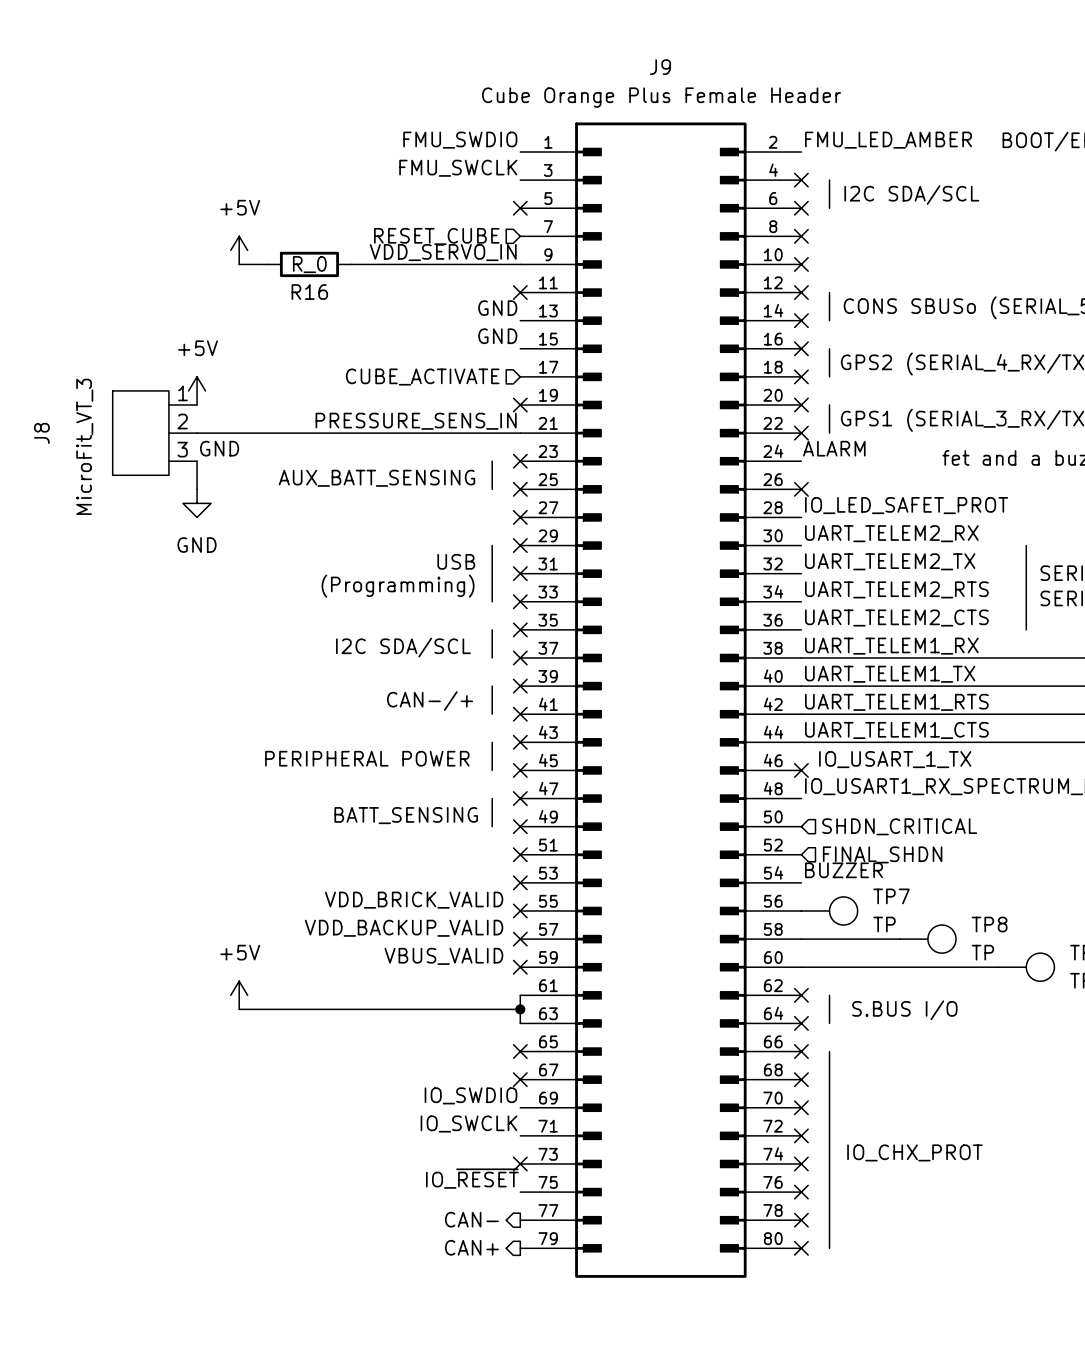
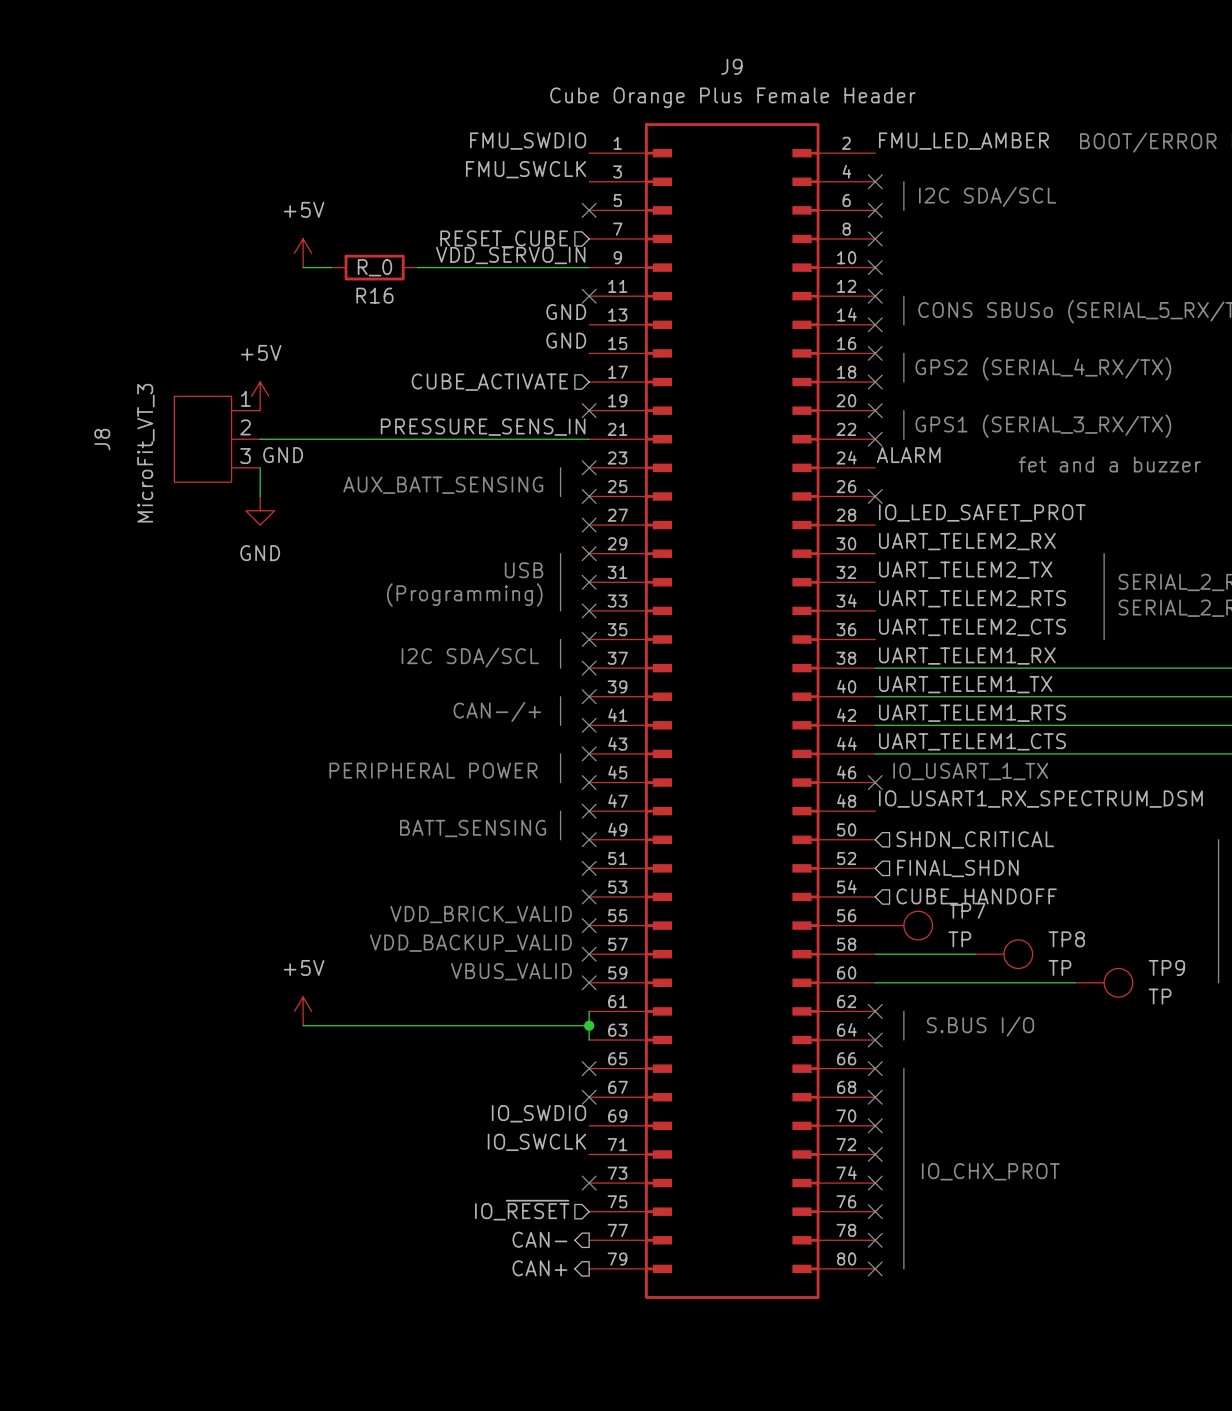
label: BUZZER (844, 870) -> none
hierarchical label: none -> CUBE_HANDOFF (976, 897)
label: IO_~{RESET} (472, 1178) -> none
hierarchical label: none -> IO_~{RESET} (522, 1210)

